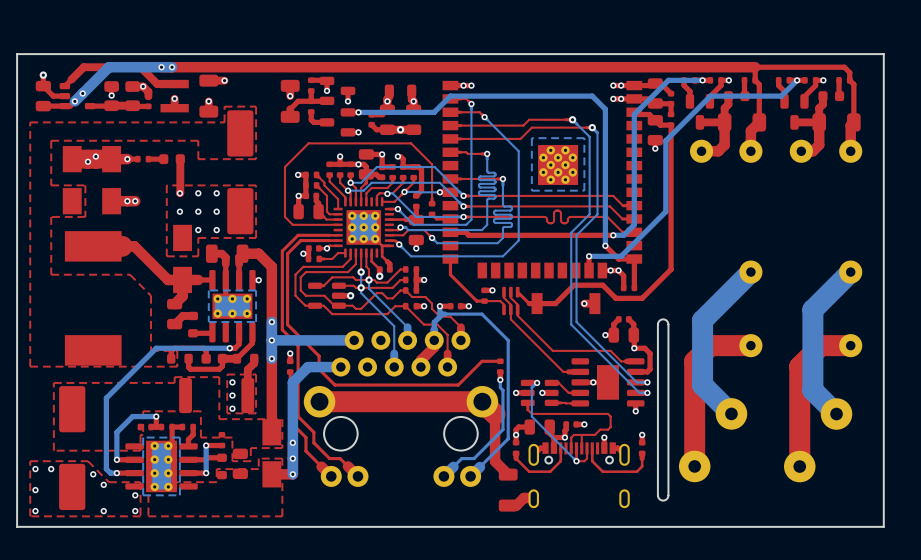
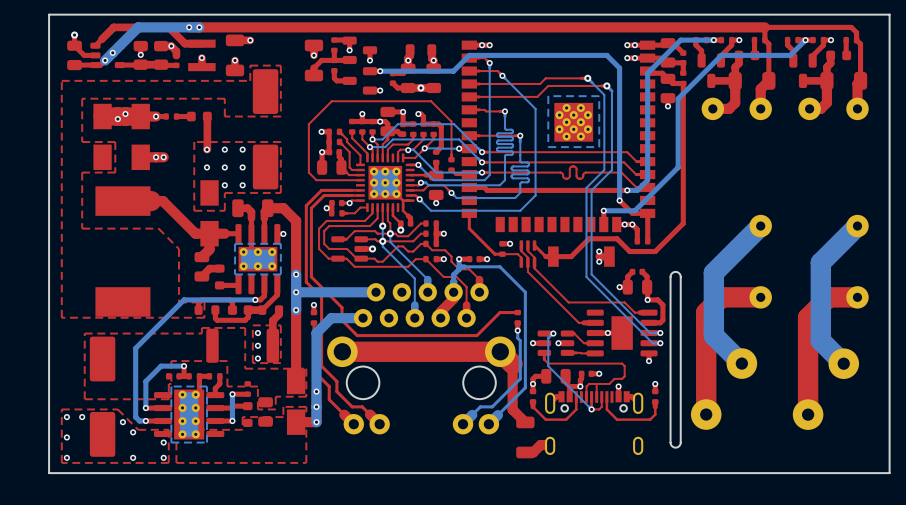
via: none -> (599, 251)
via: (584, 303) -> none
via: none -> (599, 261)

